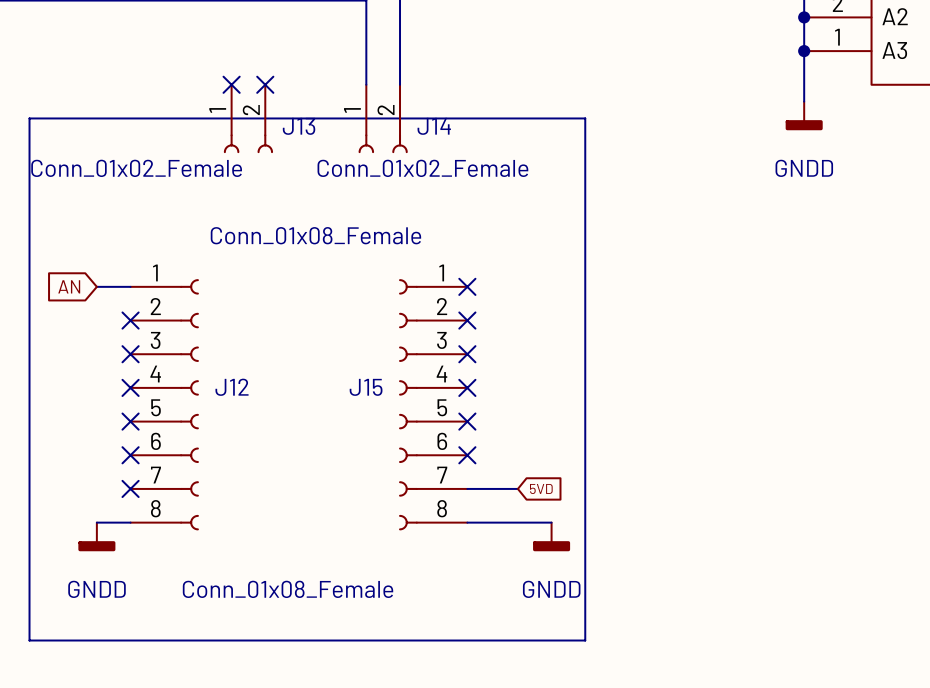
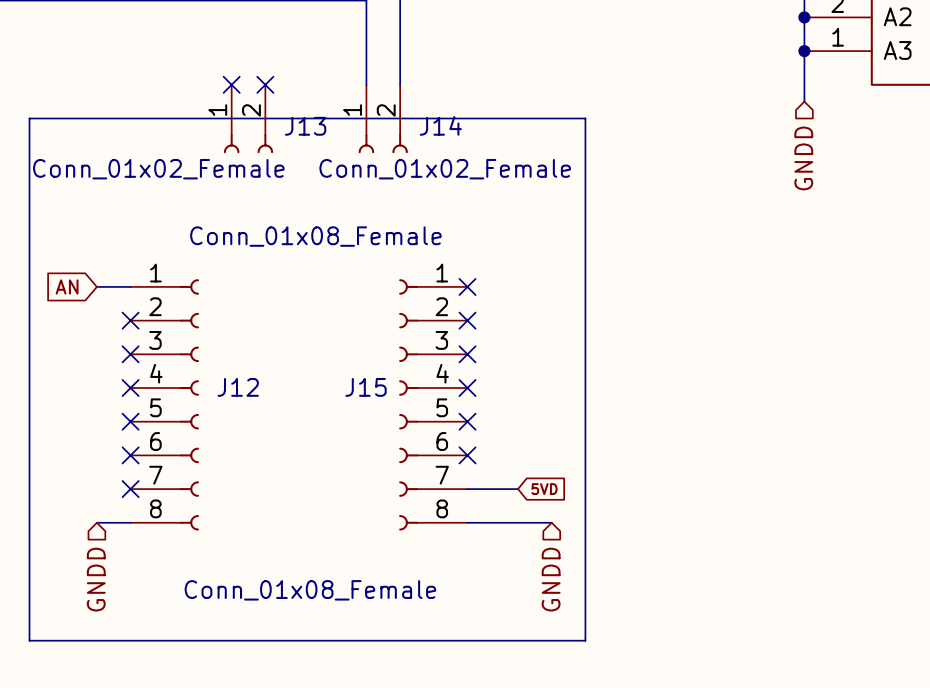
power symbol: GNDD (804, 115) -> none
hierarchical label: none -> GNDD (803, 158)
power symbol: GNDD (96, 536) -> none
power symbol: GNDD (551, 536) -> none
hierarchical label: none -> GNDD (96, 579)
hierarchical label: none -> GNDD (551, 579)

